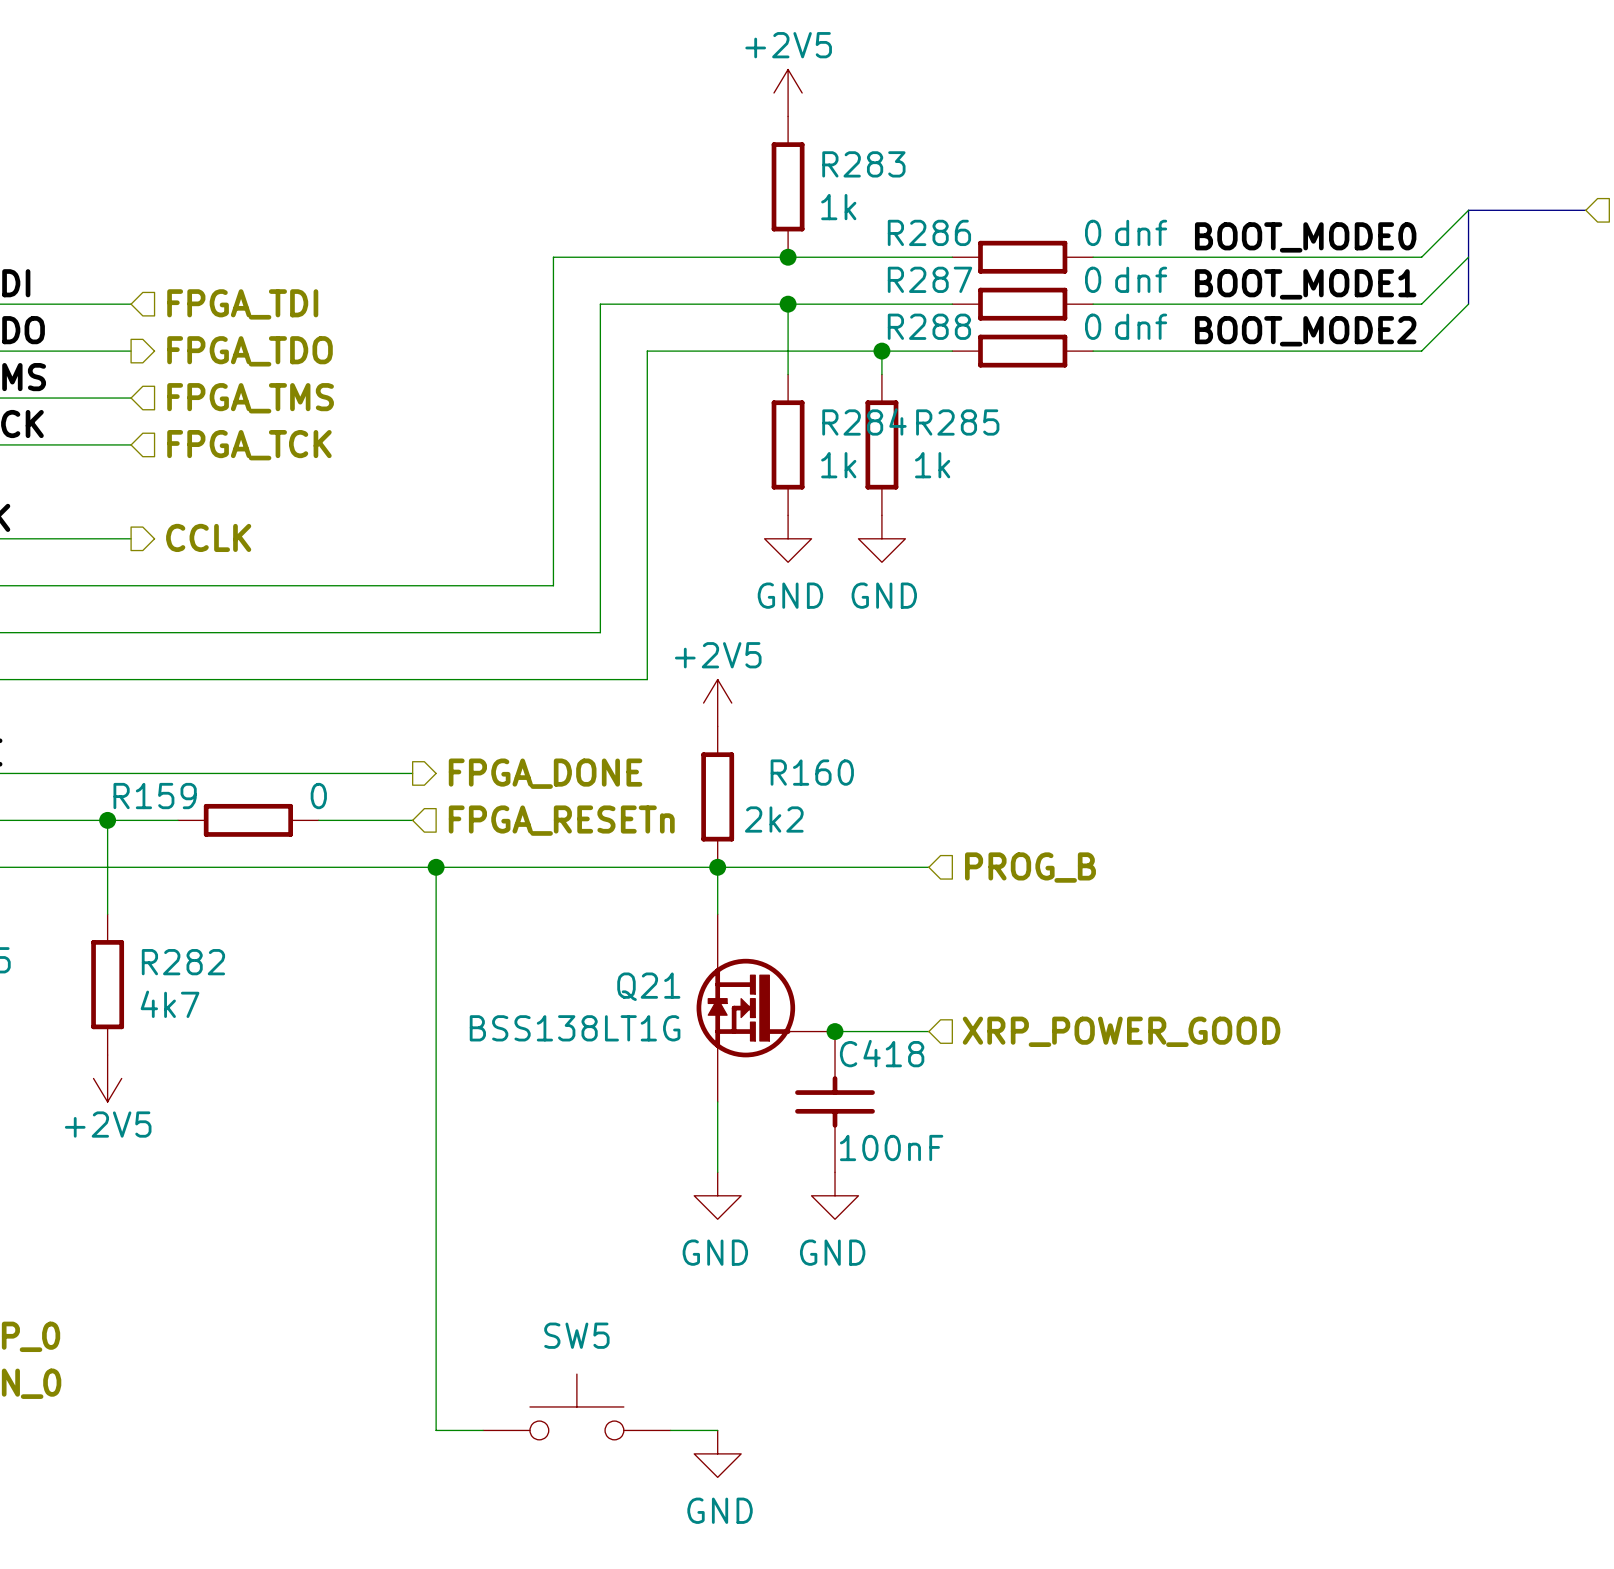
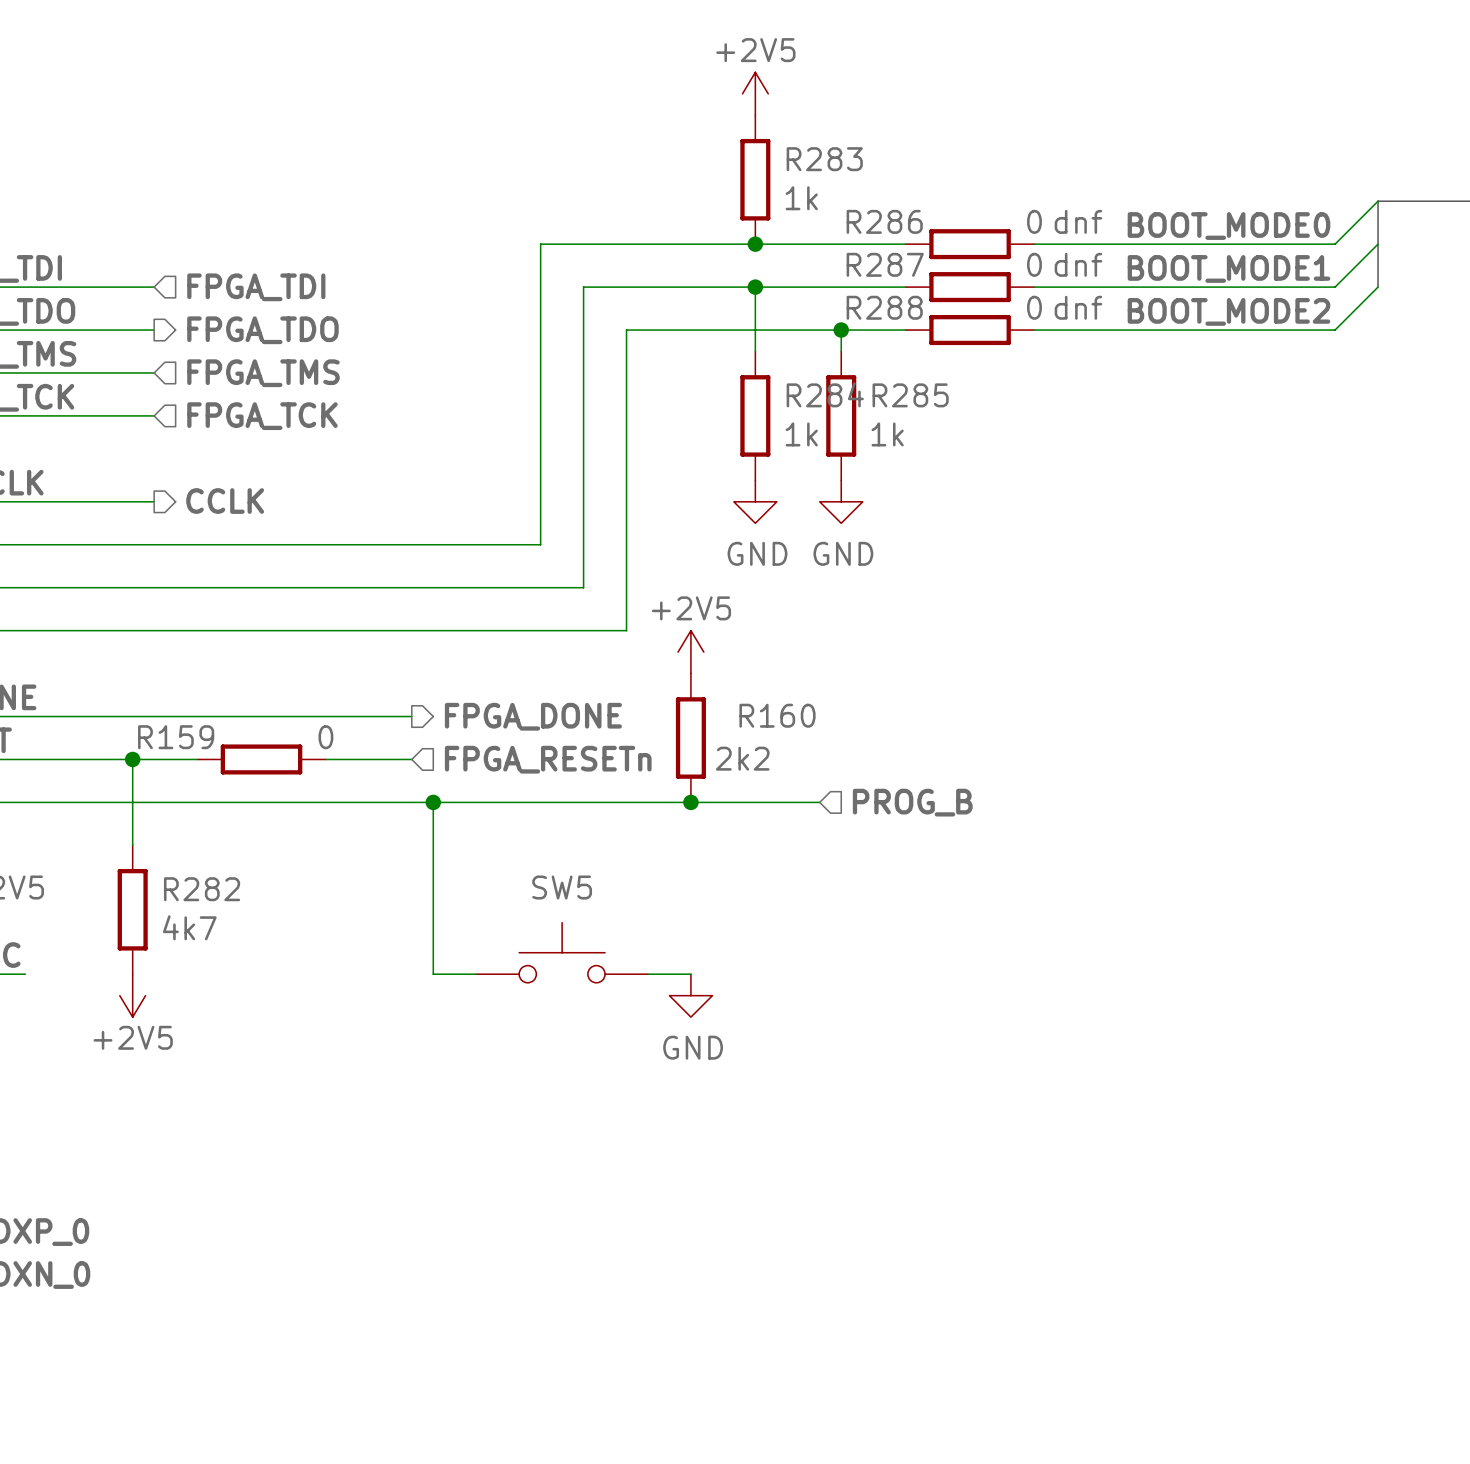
wire: (717, 867) (717, 914) -> none
wire: (858, 867) (928, 867) -> none
hierarchical label position: PROG_B (1030, 867) -> PROG_B (912, 802)
Q21: BSS138LT1G (765, 1008) -> none
wire: (835, 1031) (928, 1031) -> none
junction: (835, 1031) -> none
hierarchical label: XRP_POWER_GOOD (1121, 1031) -> none
wire: (436, 1055) (436, 1430) (483, 1430) -> (433, 974) (476, 974)
power symbol: none -> GND (690, 995)
wire: (717, 1101) (717, 1172) -> none
C418: (835, 1101) -> none
power symbol: GND (717, 1195) -> none
power symbol: GND (835, 1195) -> none
SW5 position: (576, 1406) -> (562, 952)
wire: (670, 1430) (717, 1430) -> (647, 974) (690, 974)
power symbol: GND (717, 1453) -> none

